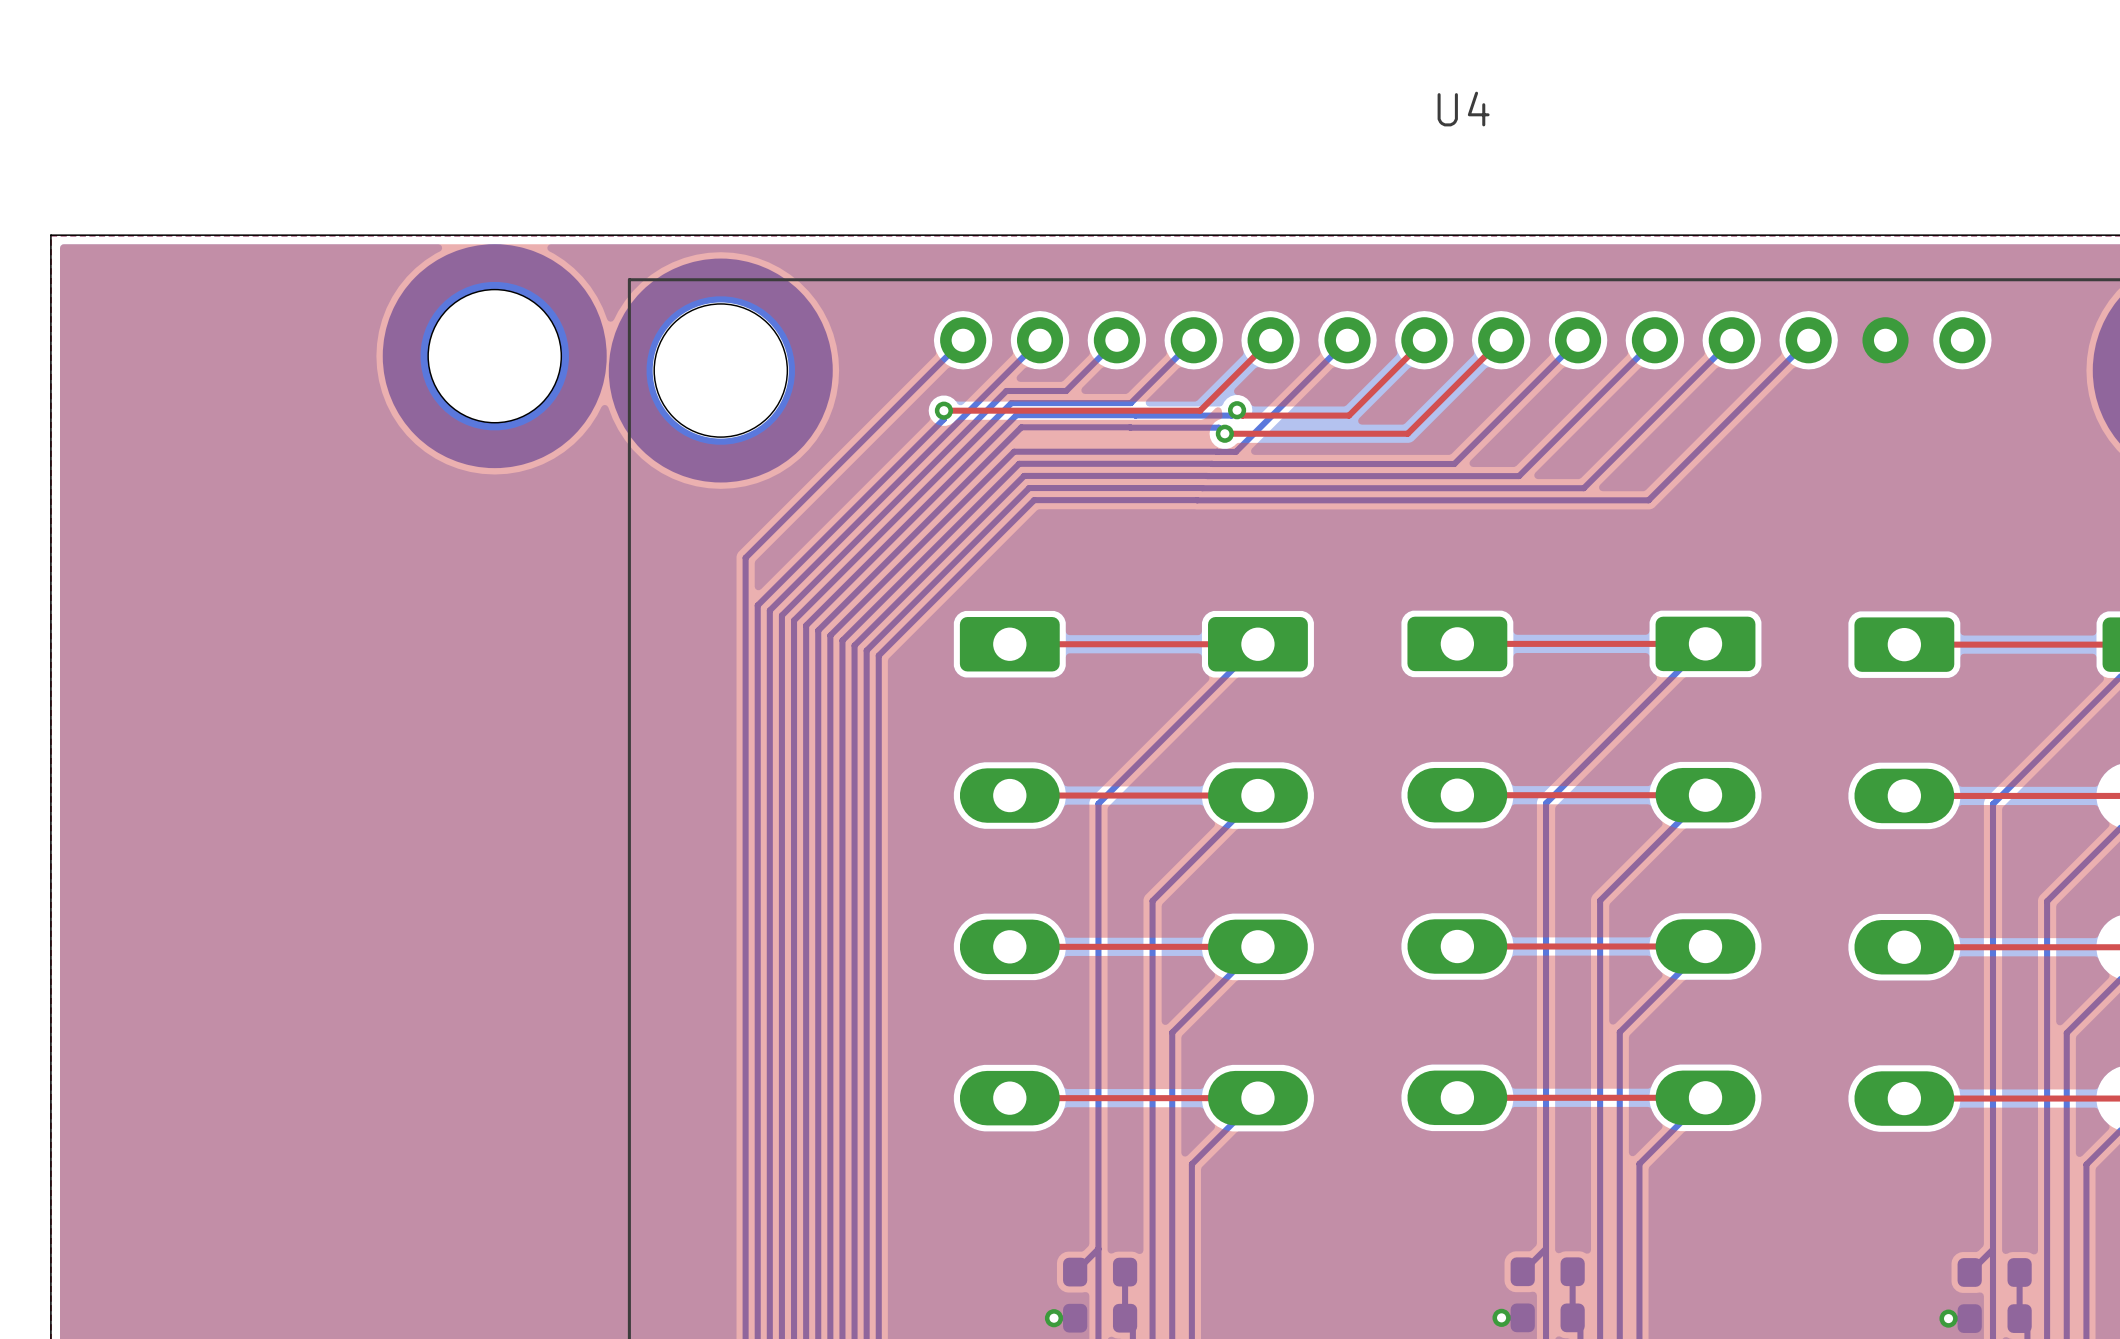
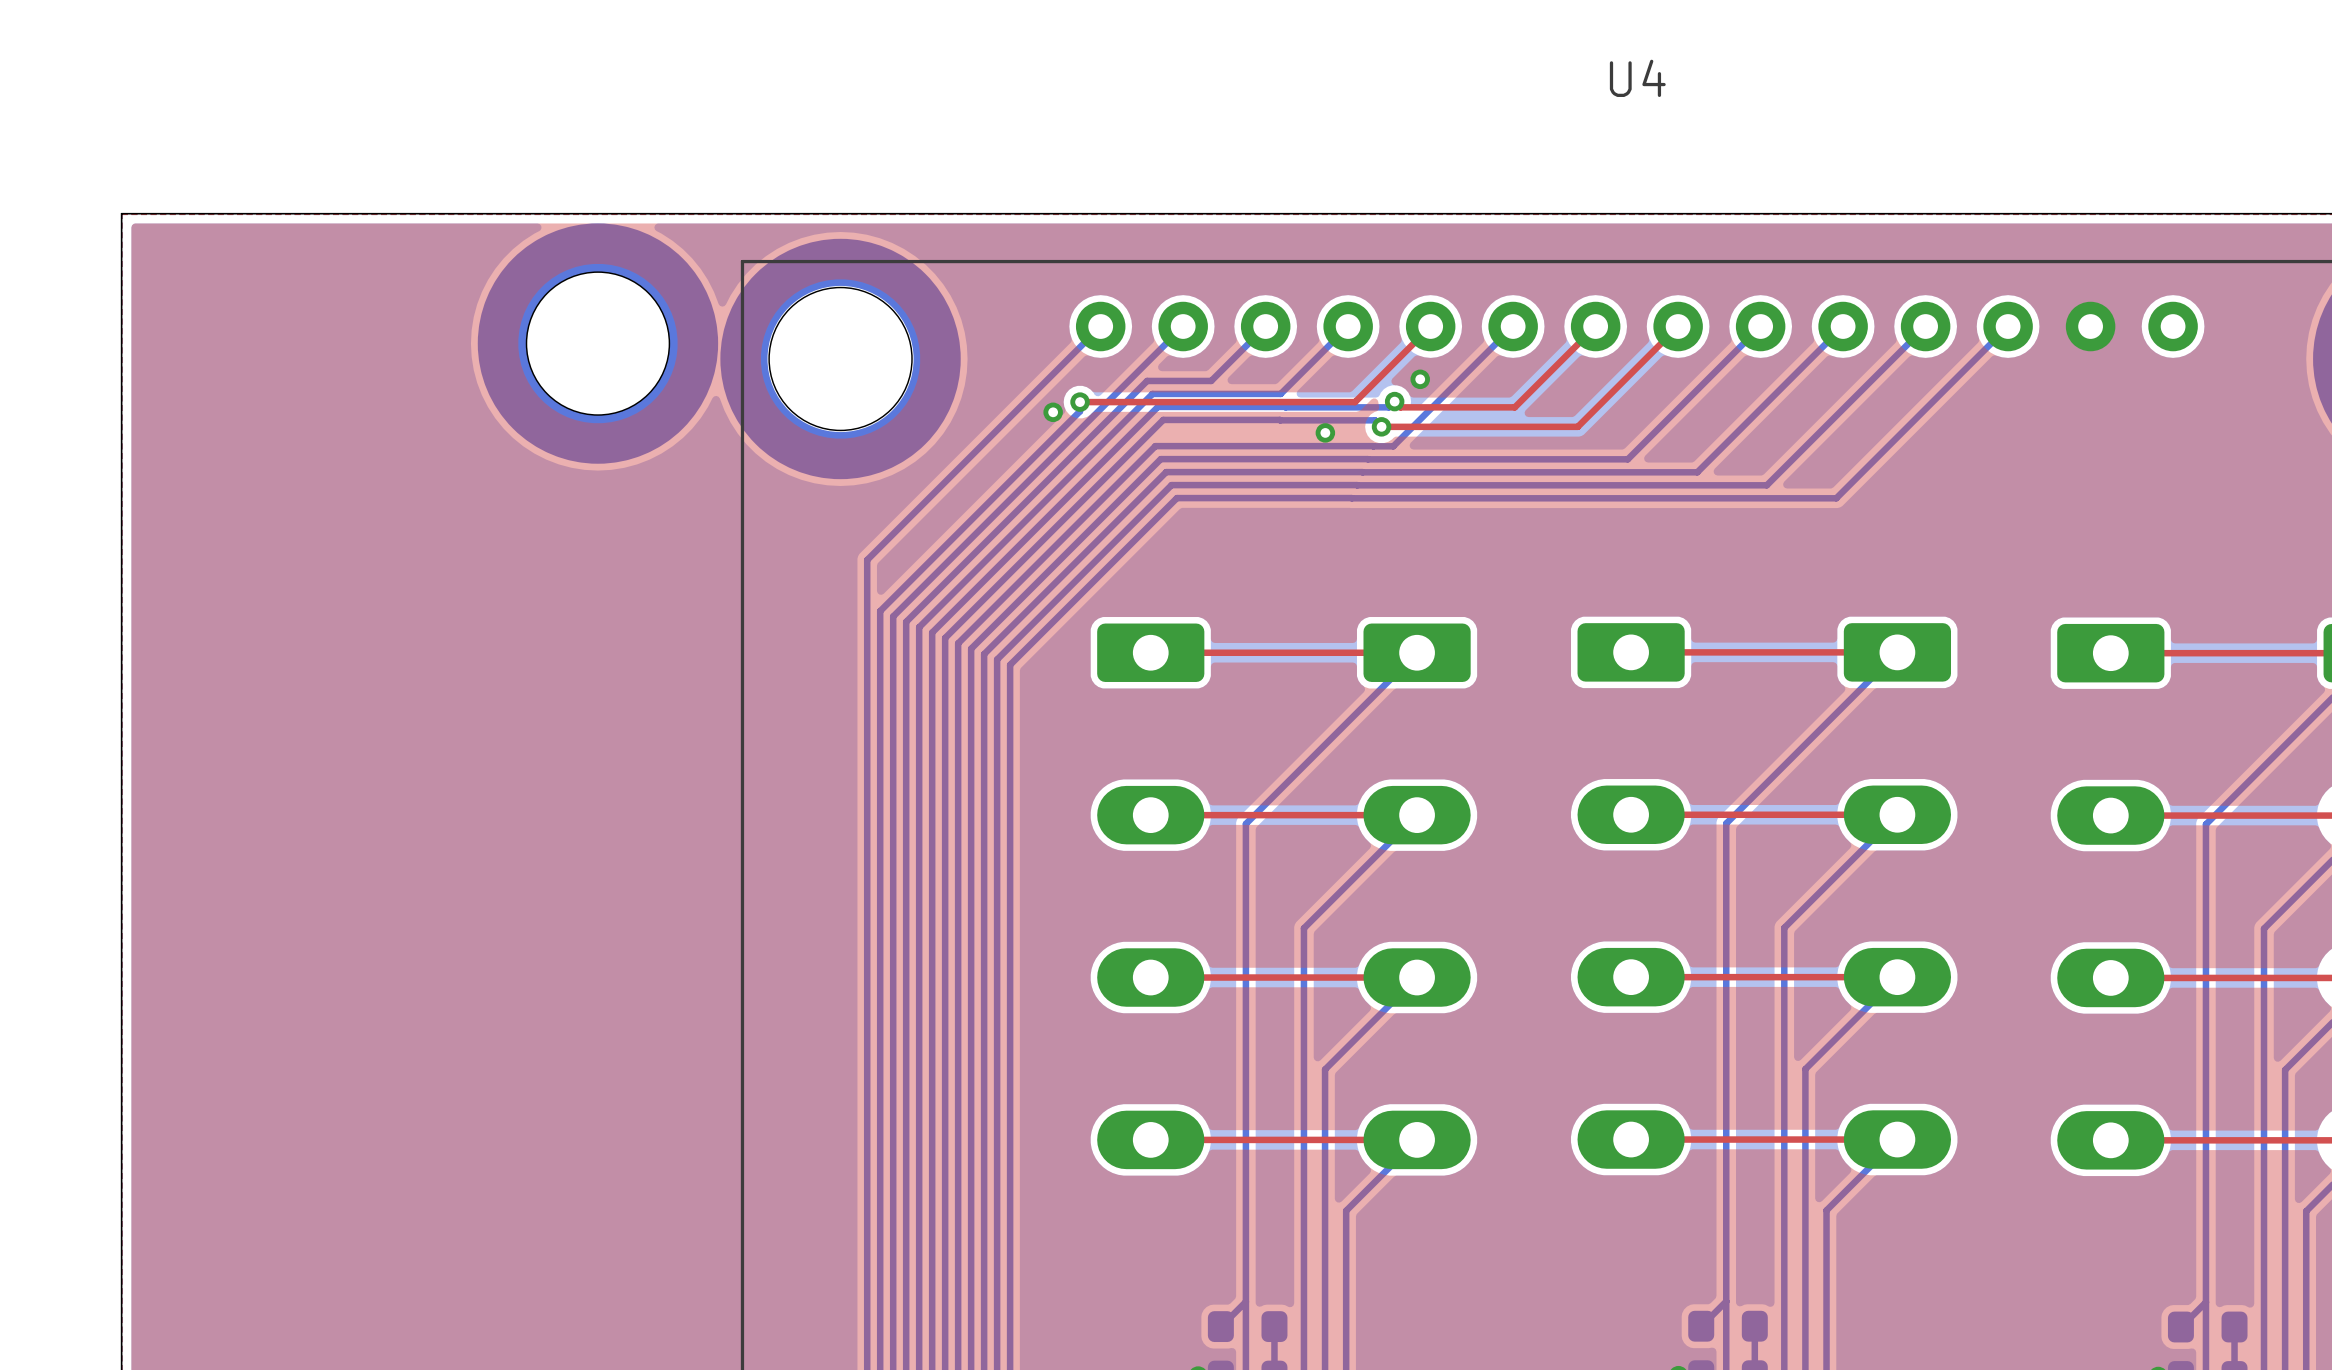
via: none -> (1420, 379)
via: none -> (1053, 412)
via: none -> (1325, 432)

